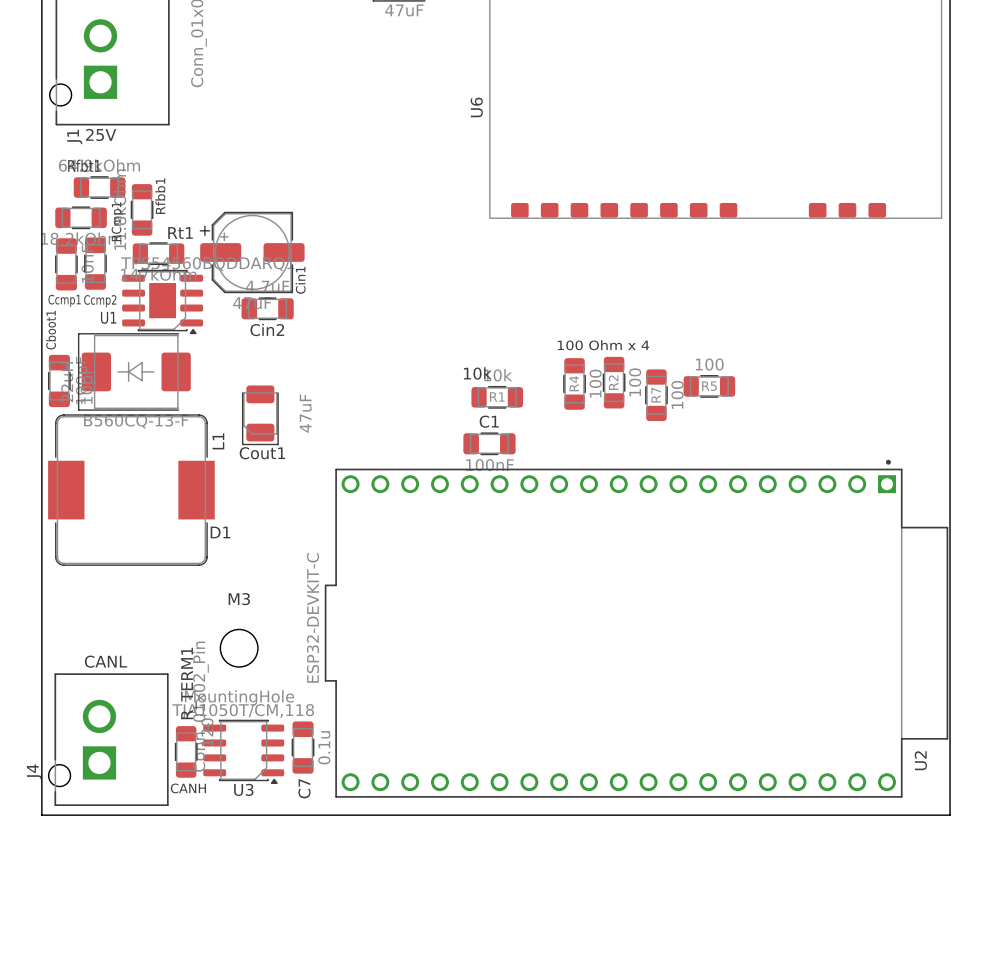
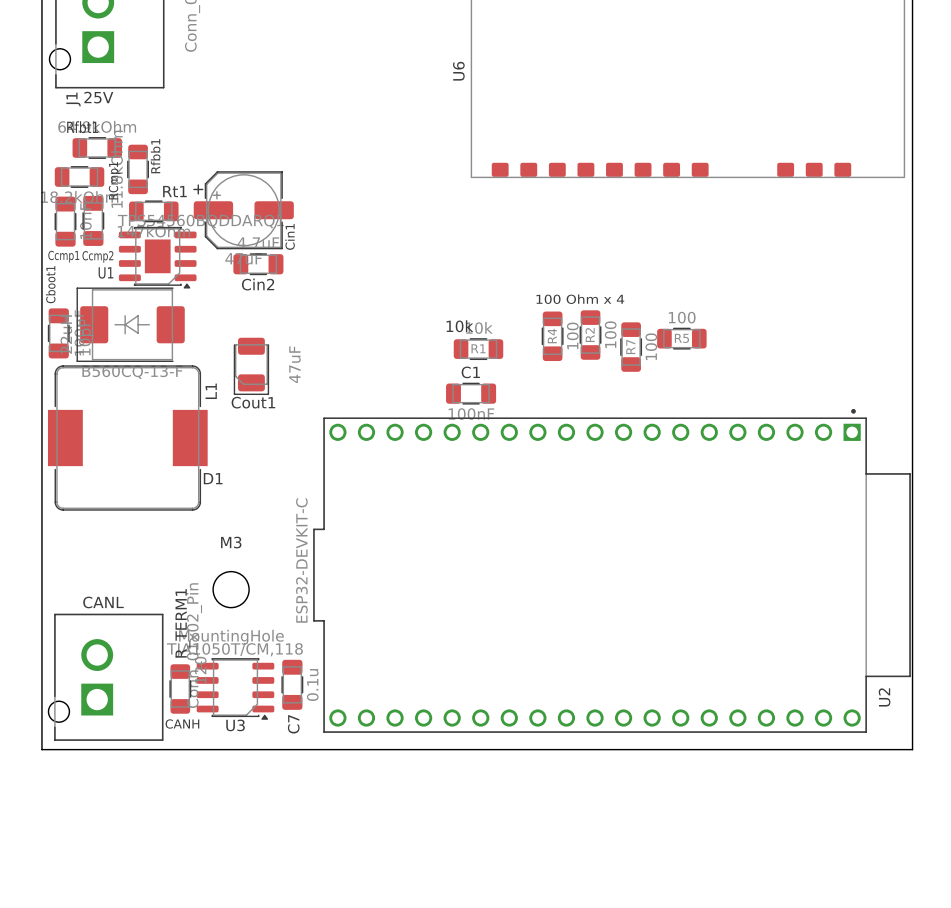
J4 name: J4 (34, 771) -> none

